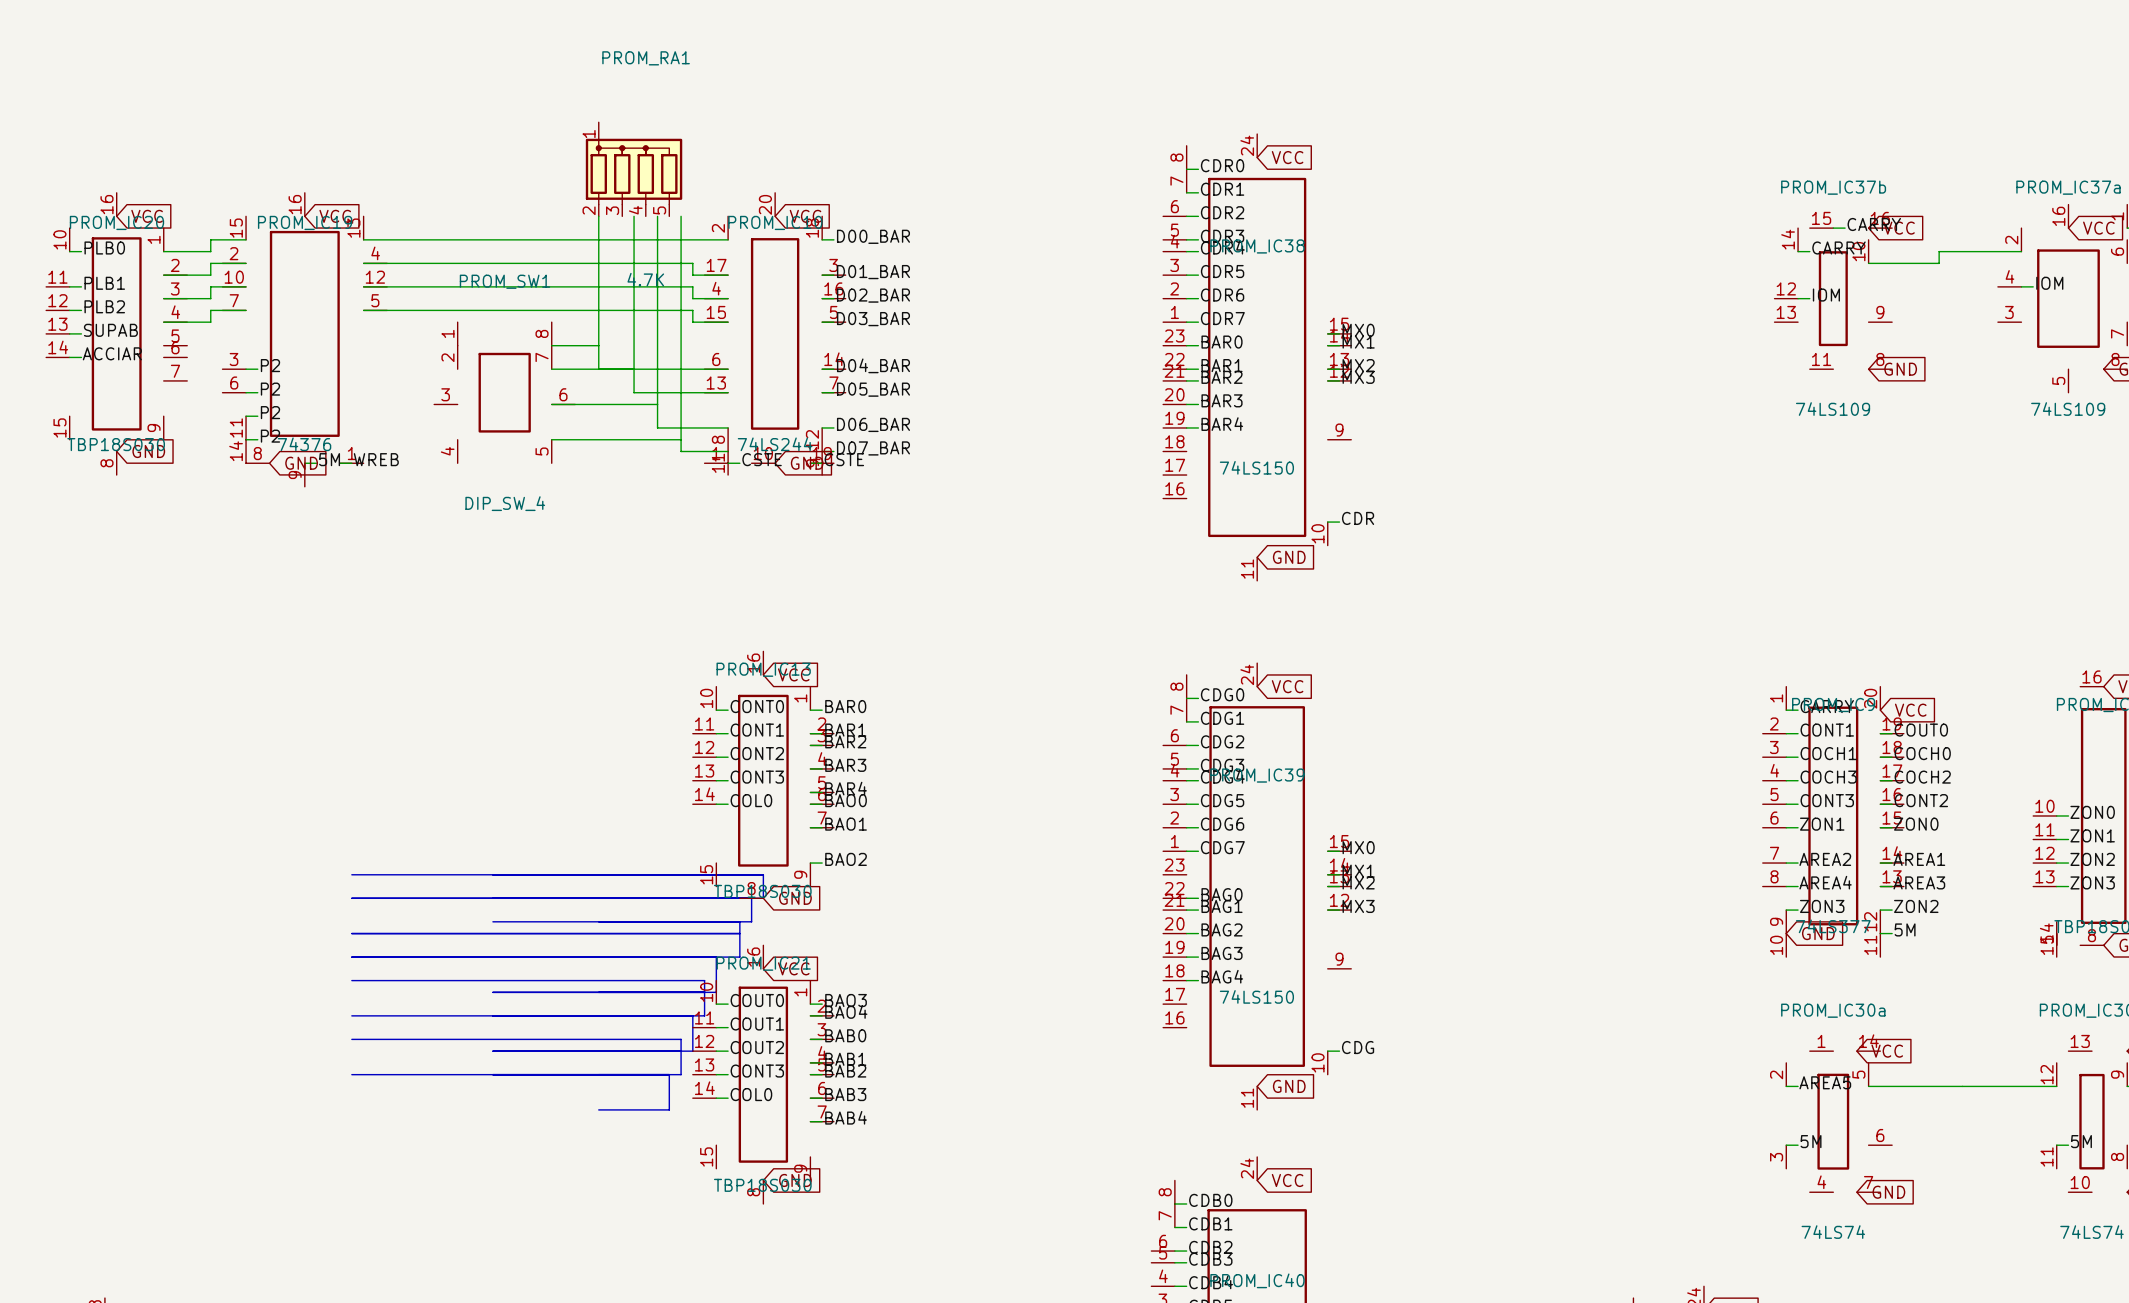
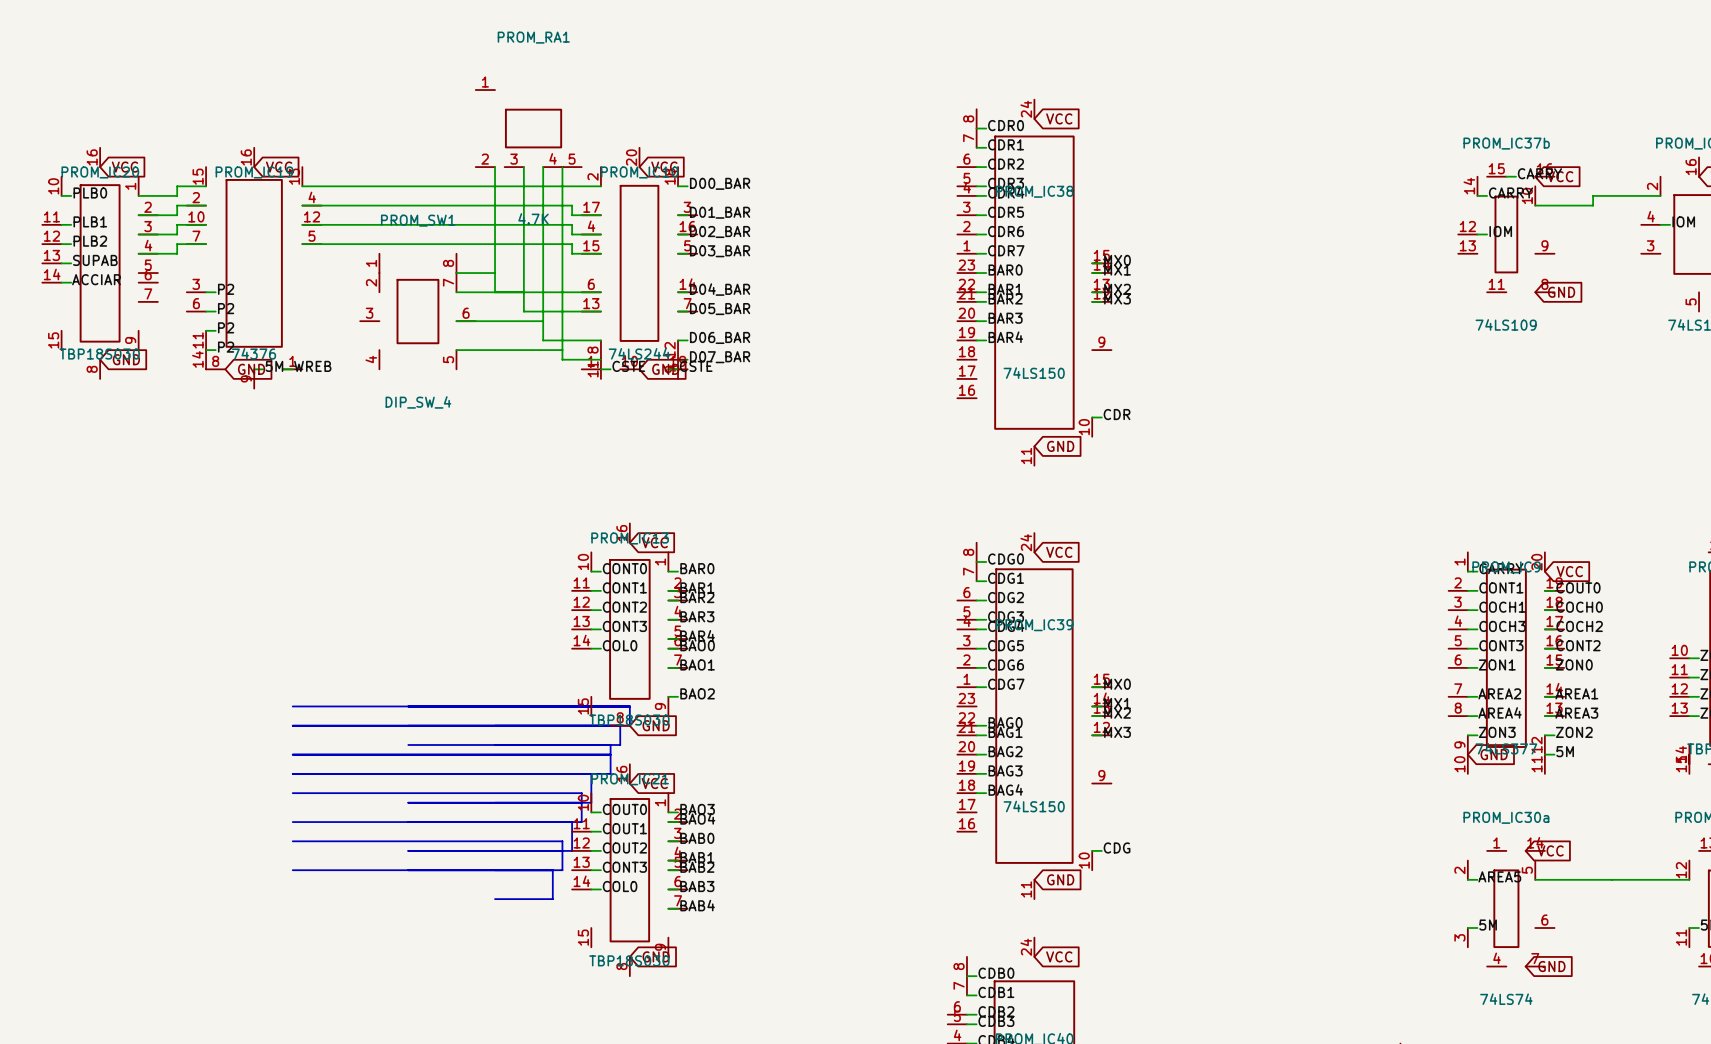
PROM_RA1 symbol: [585, 122, 683, 217] -> [475, 90, 582, 168]

